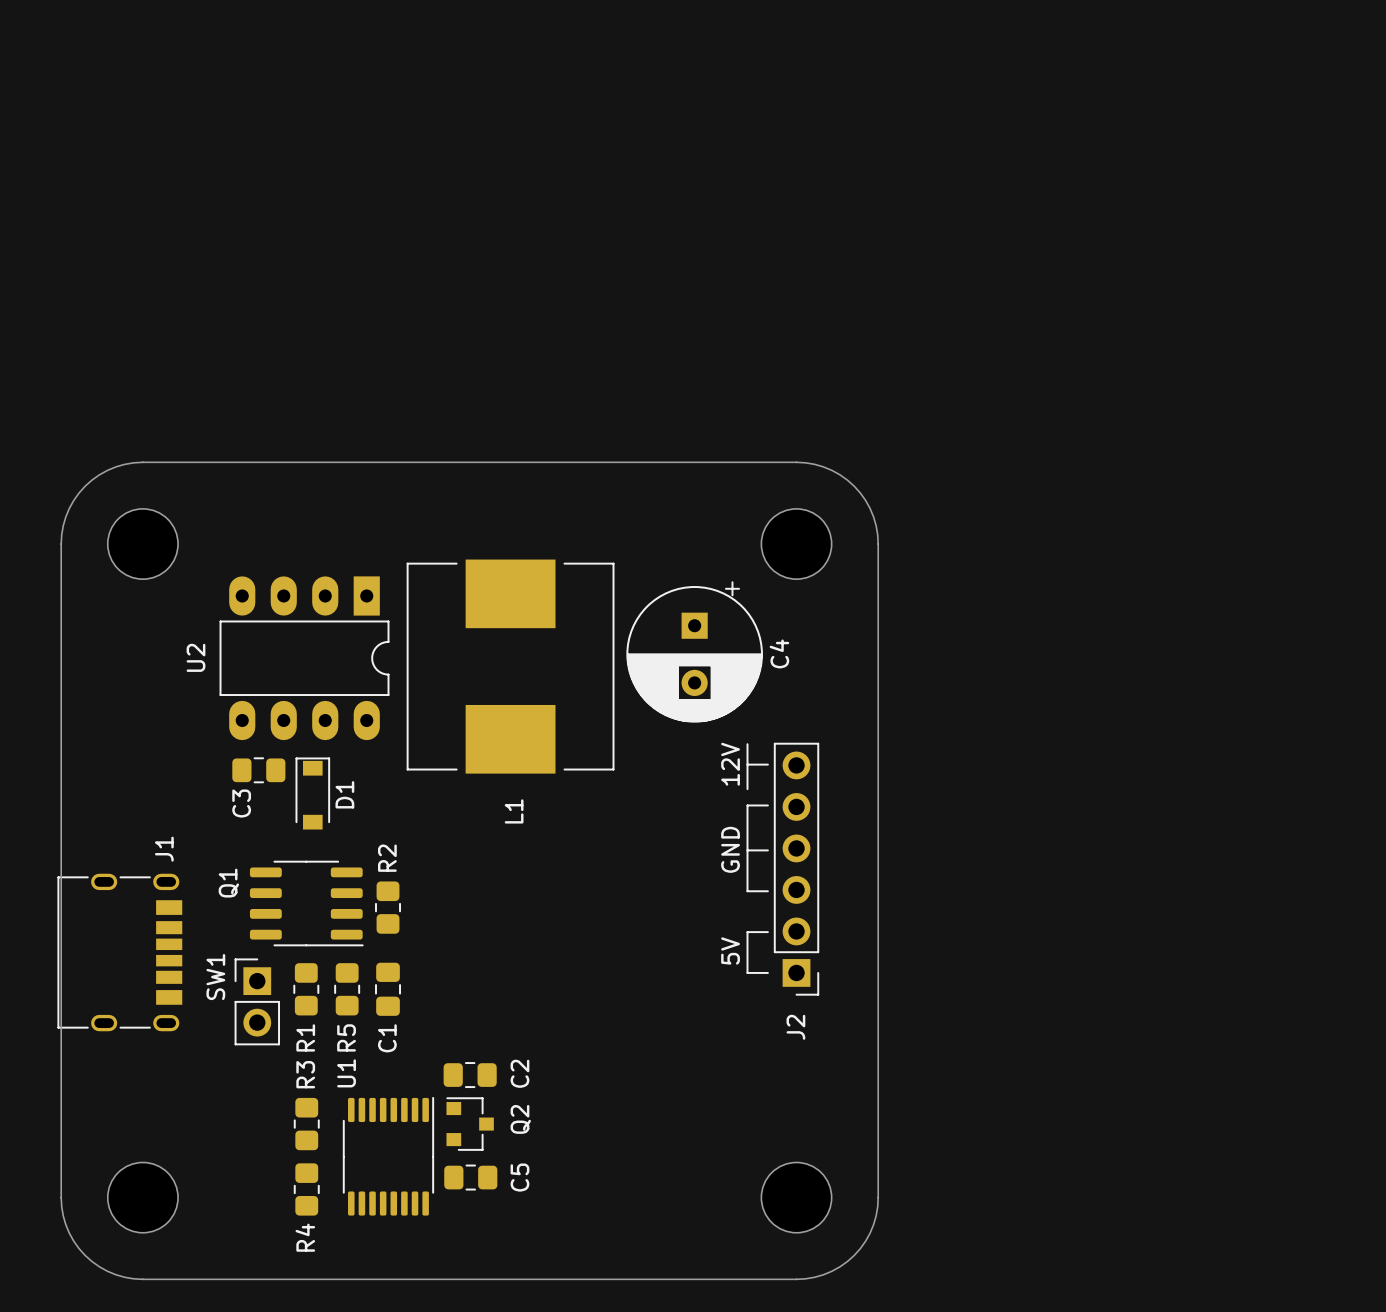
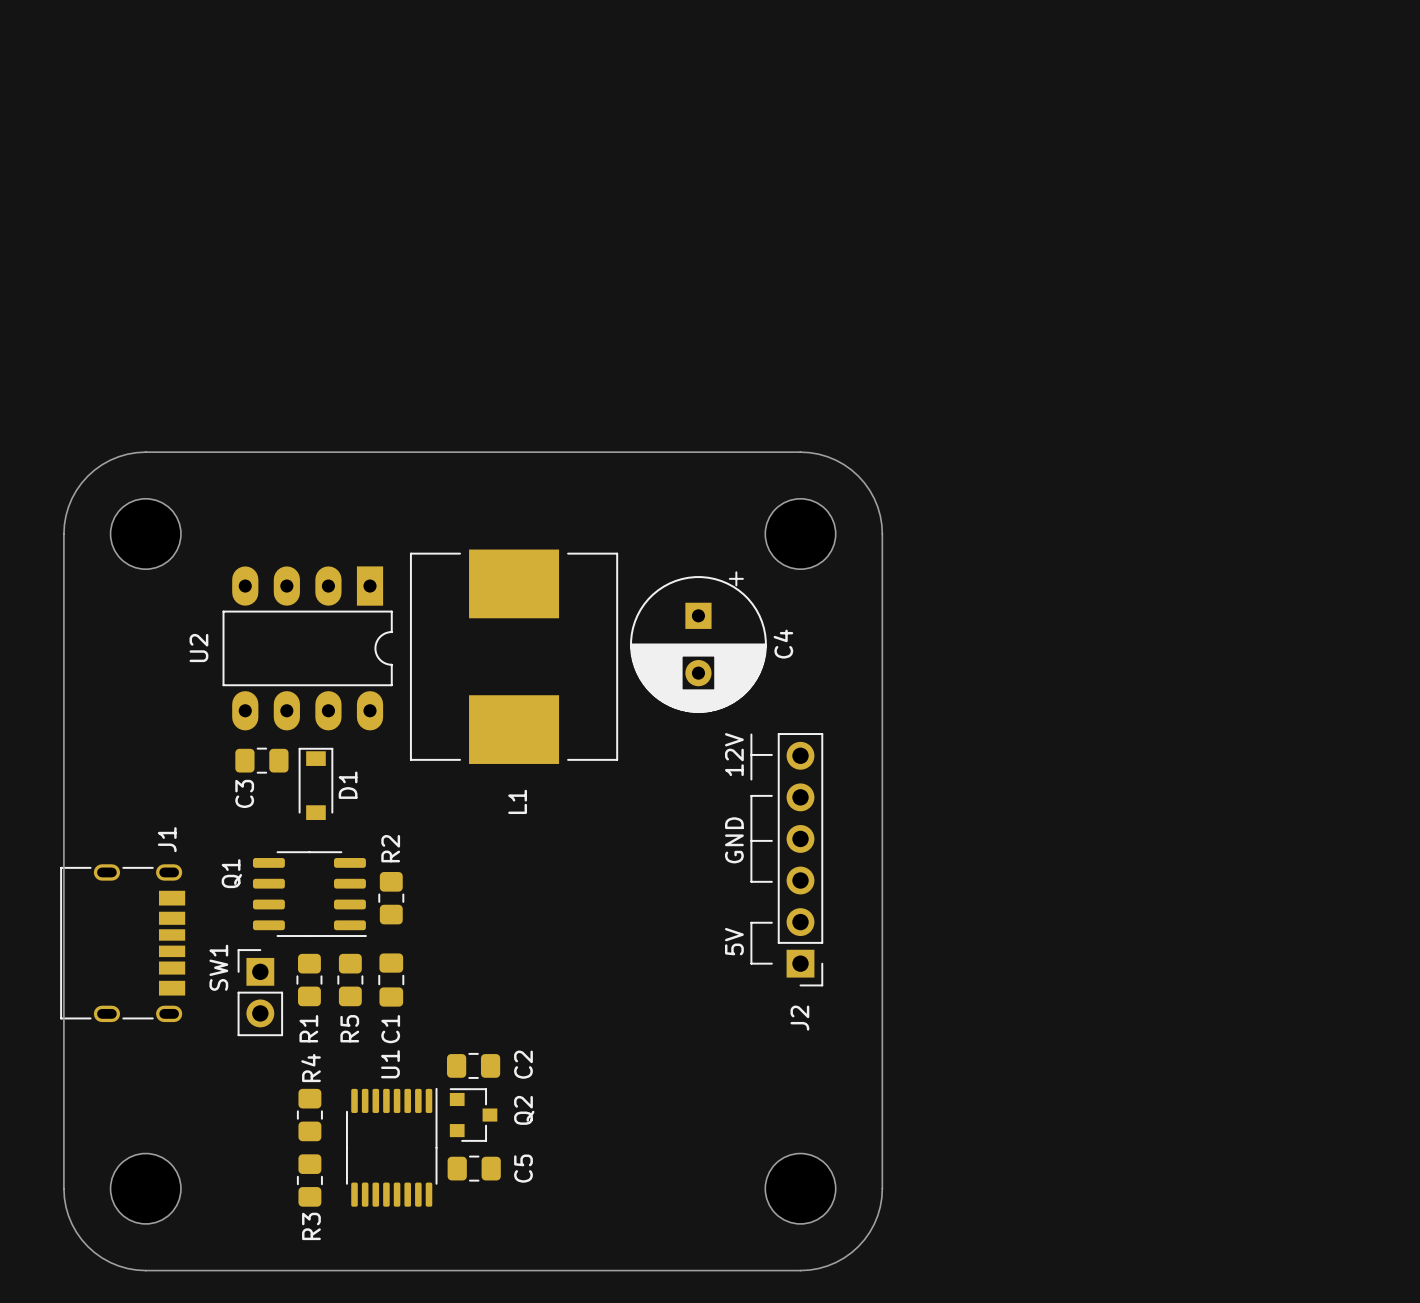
U1 name position: U1 (346, 1073) -> U1 (390, 1064)
R3 name: R3 (305, 1074) -> R4 (311, 1068)
R4 name: R4 (305, 1237) -> R3 (311, 1226)

